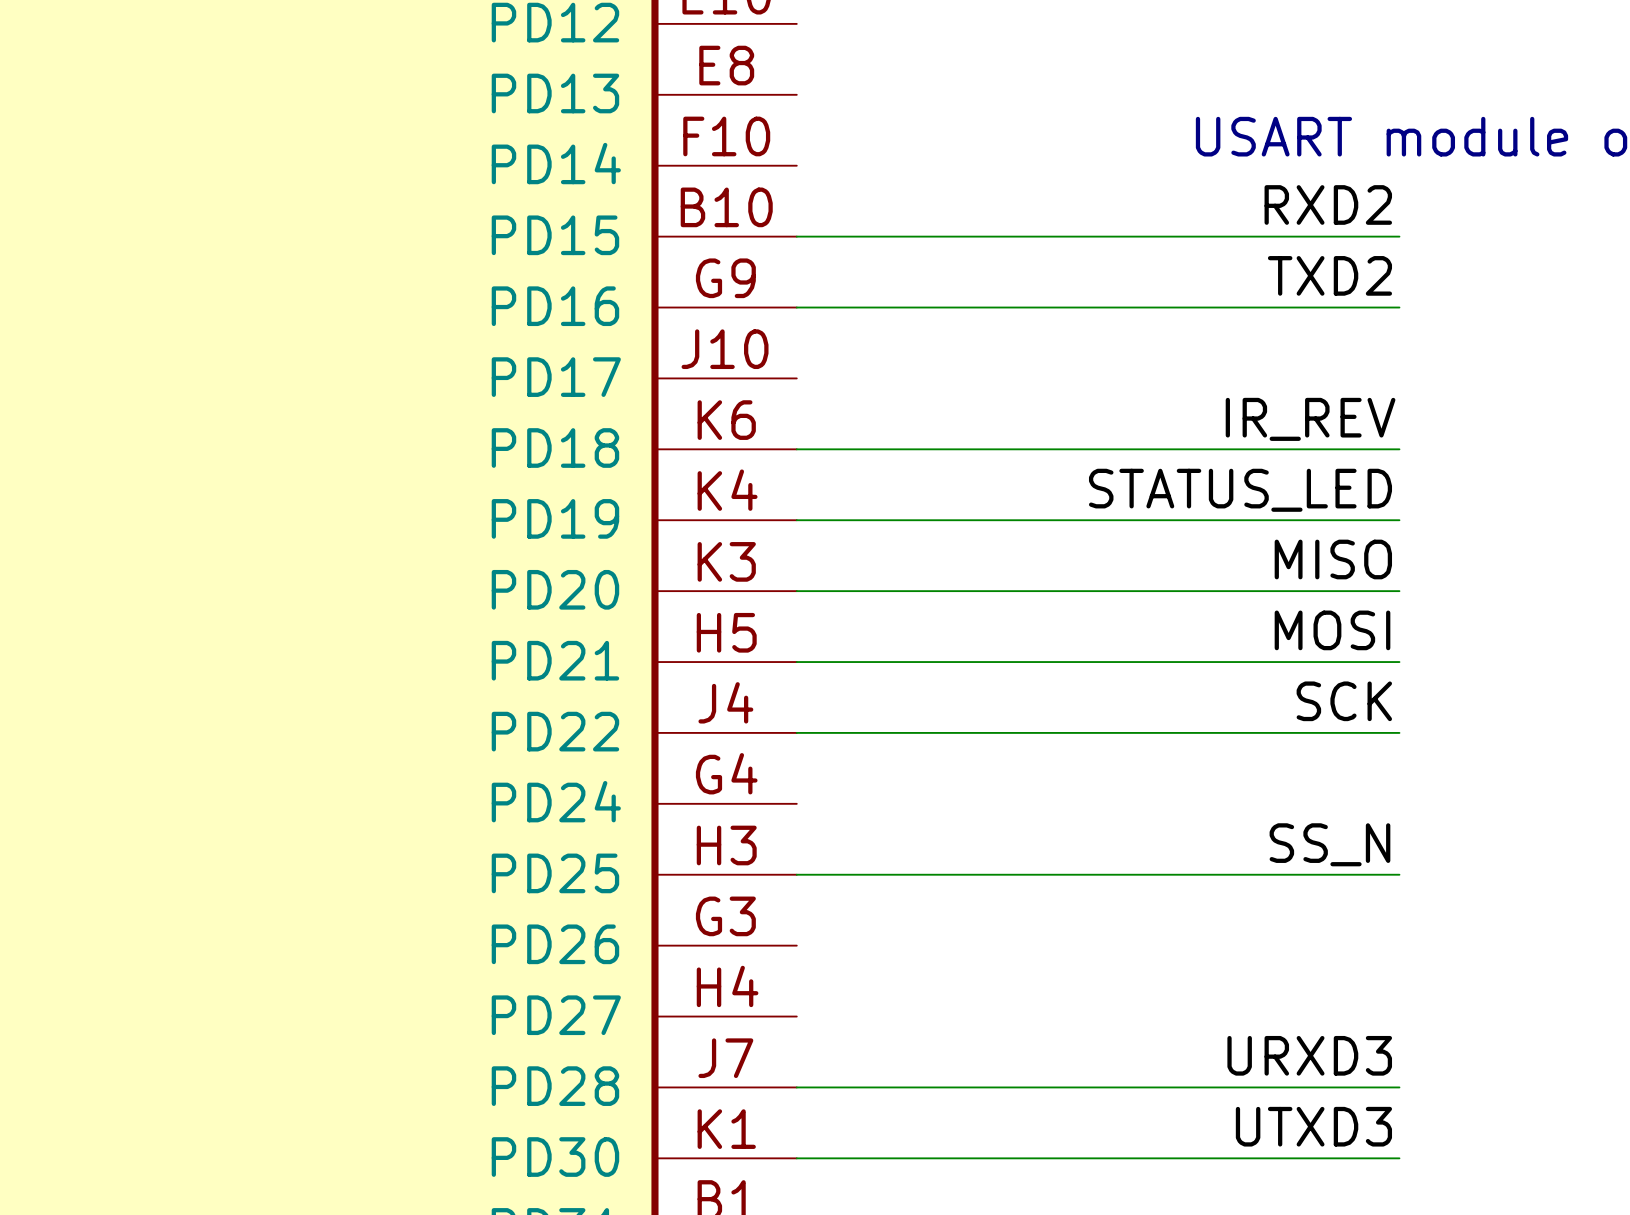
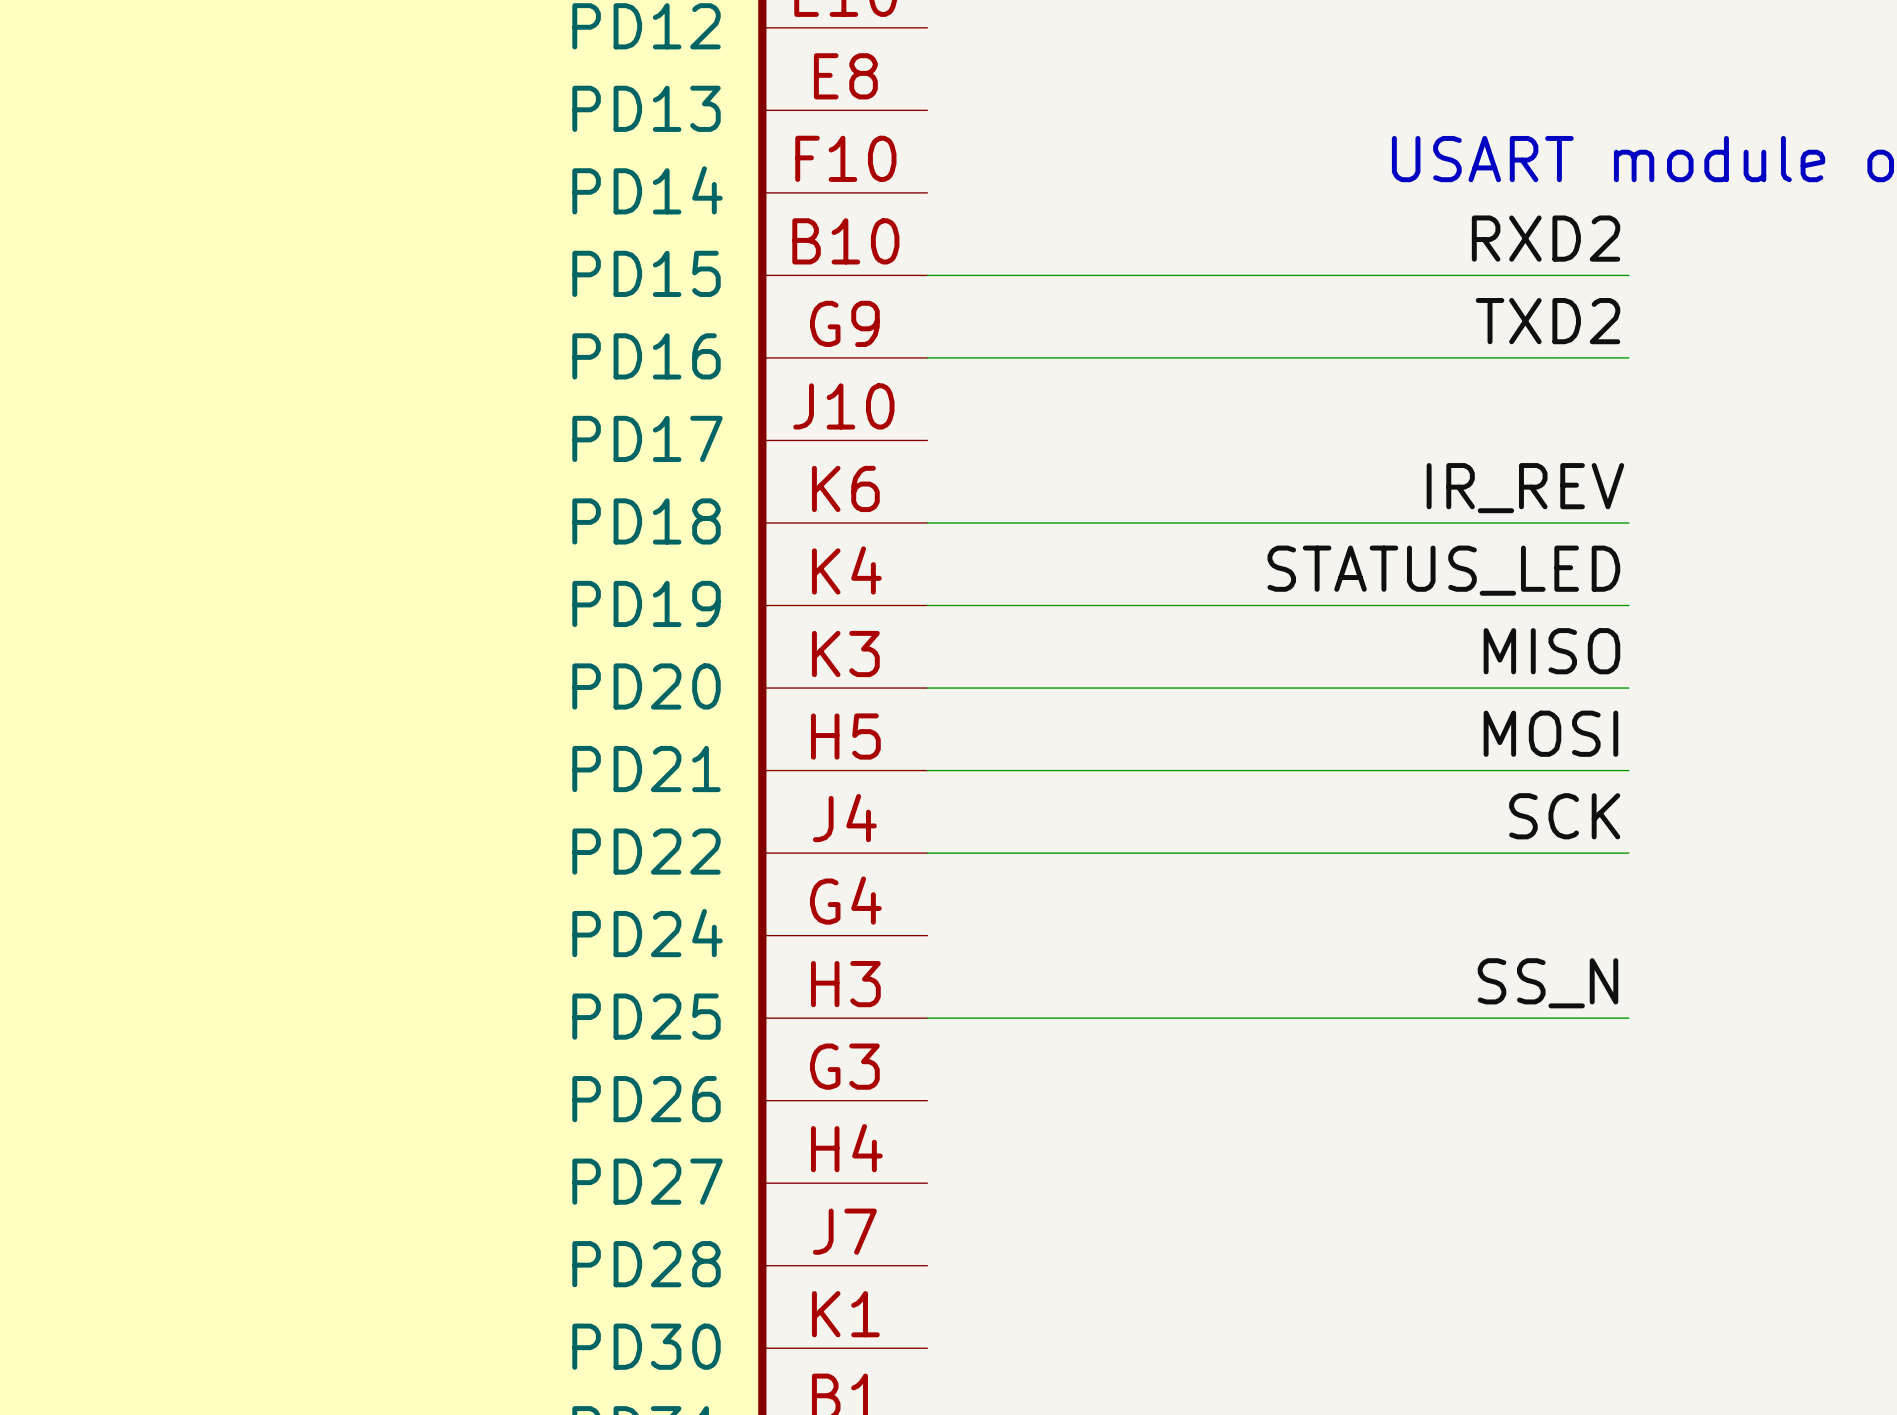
label: URXD3 (1309, 1055) -> none
wire: (796, 1087) (1399, 1087) -> none
label: UTXD3 (1313, 1126) -> none
wire: (796, 1158) (1399, 1158) -> none

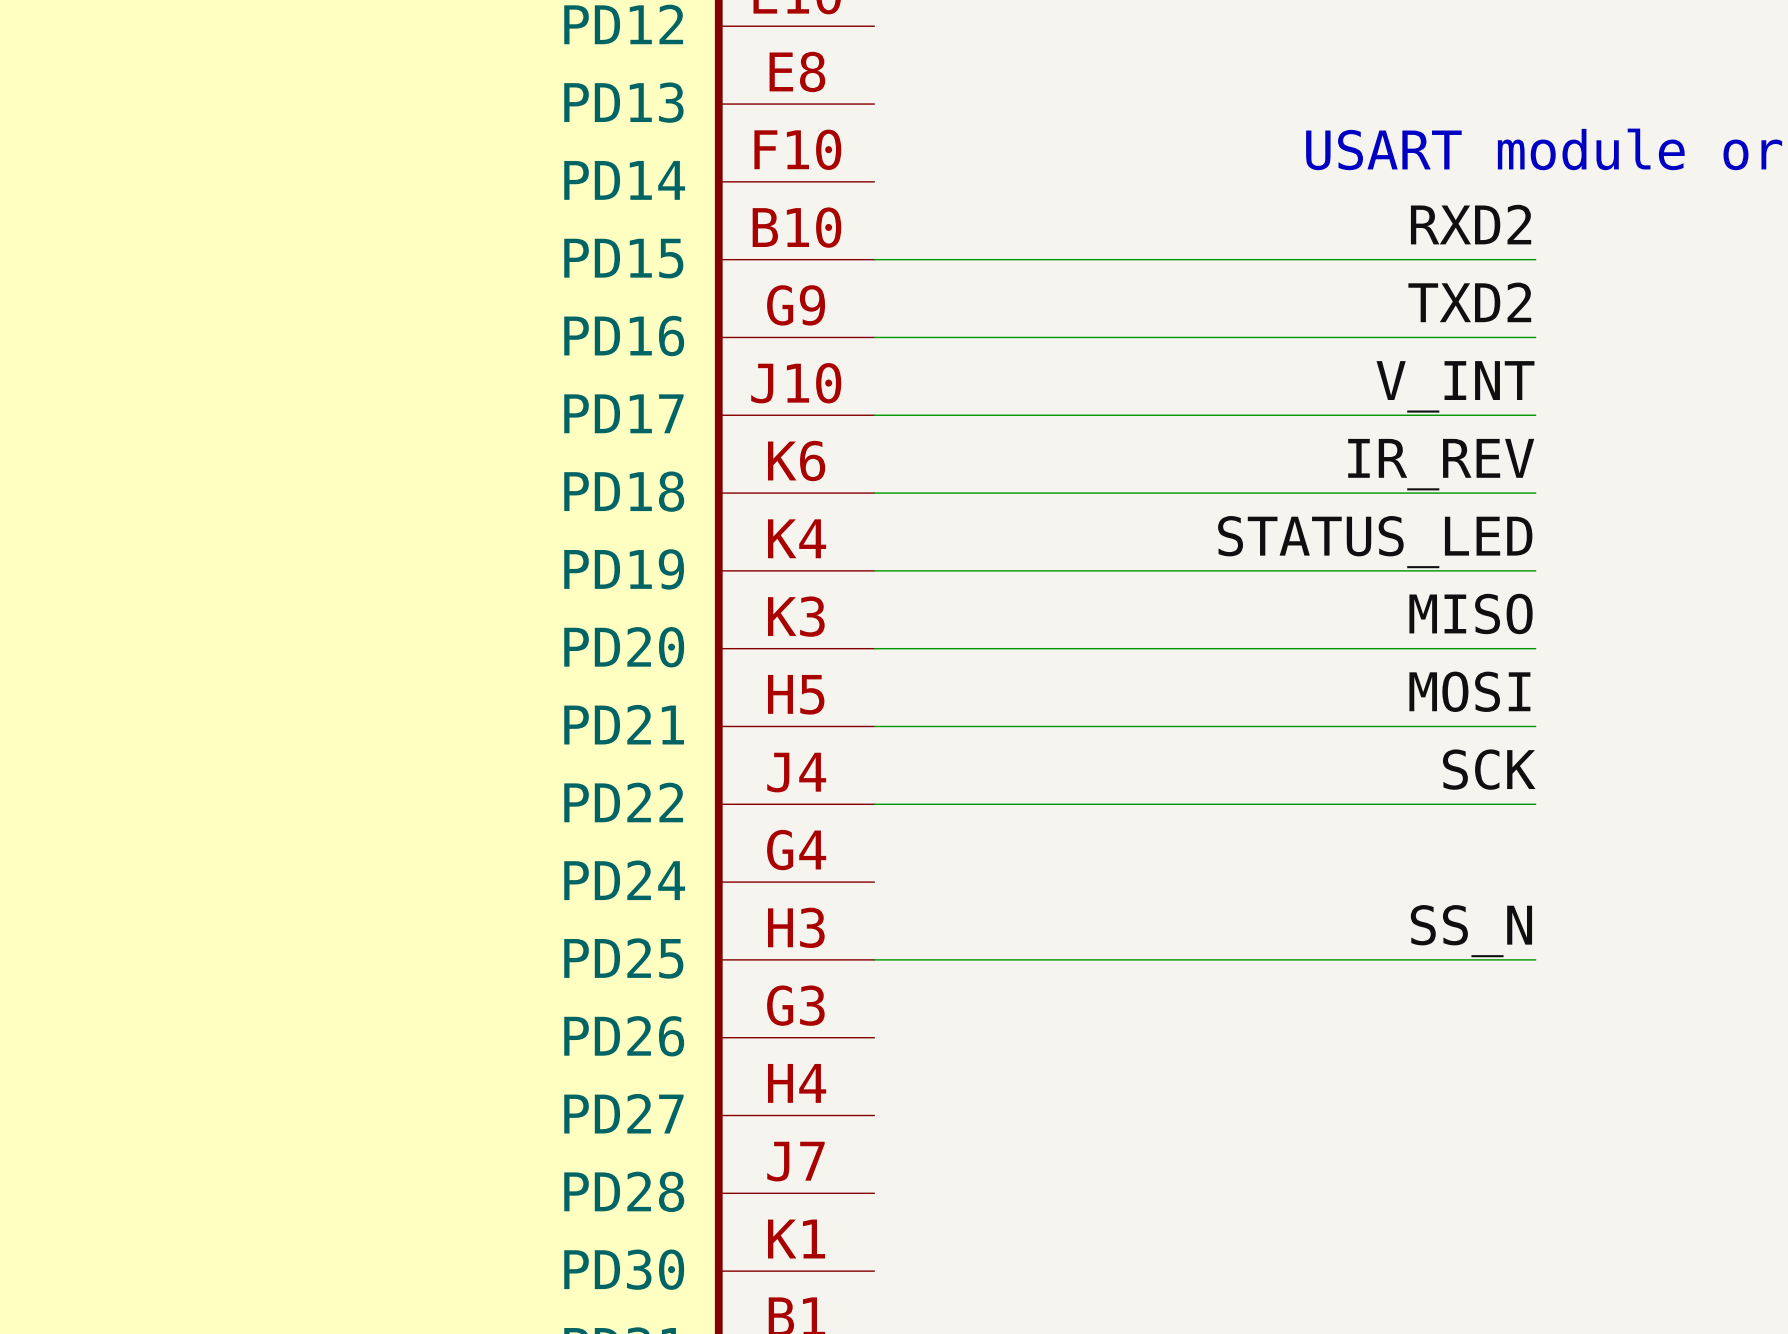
label: none -> V_INT (1455, 386)
wire: none -> (874, 415) (1535, 415)

